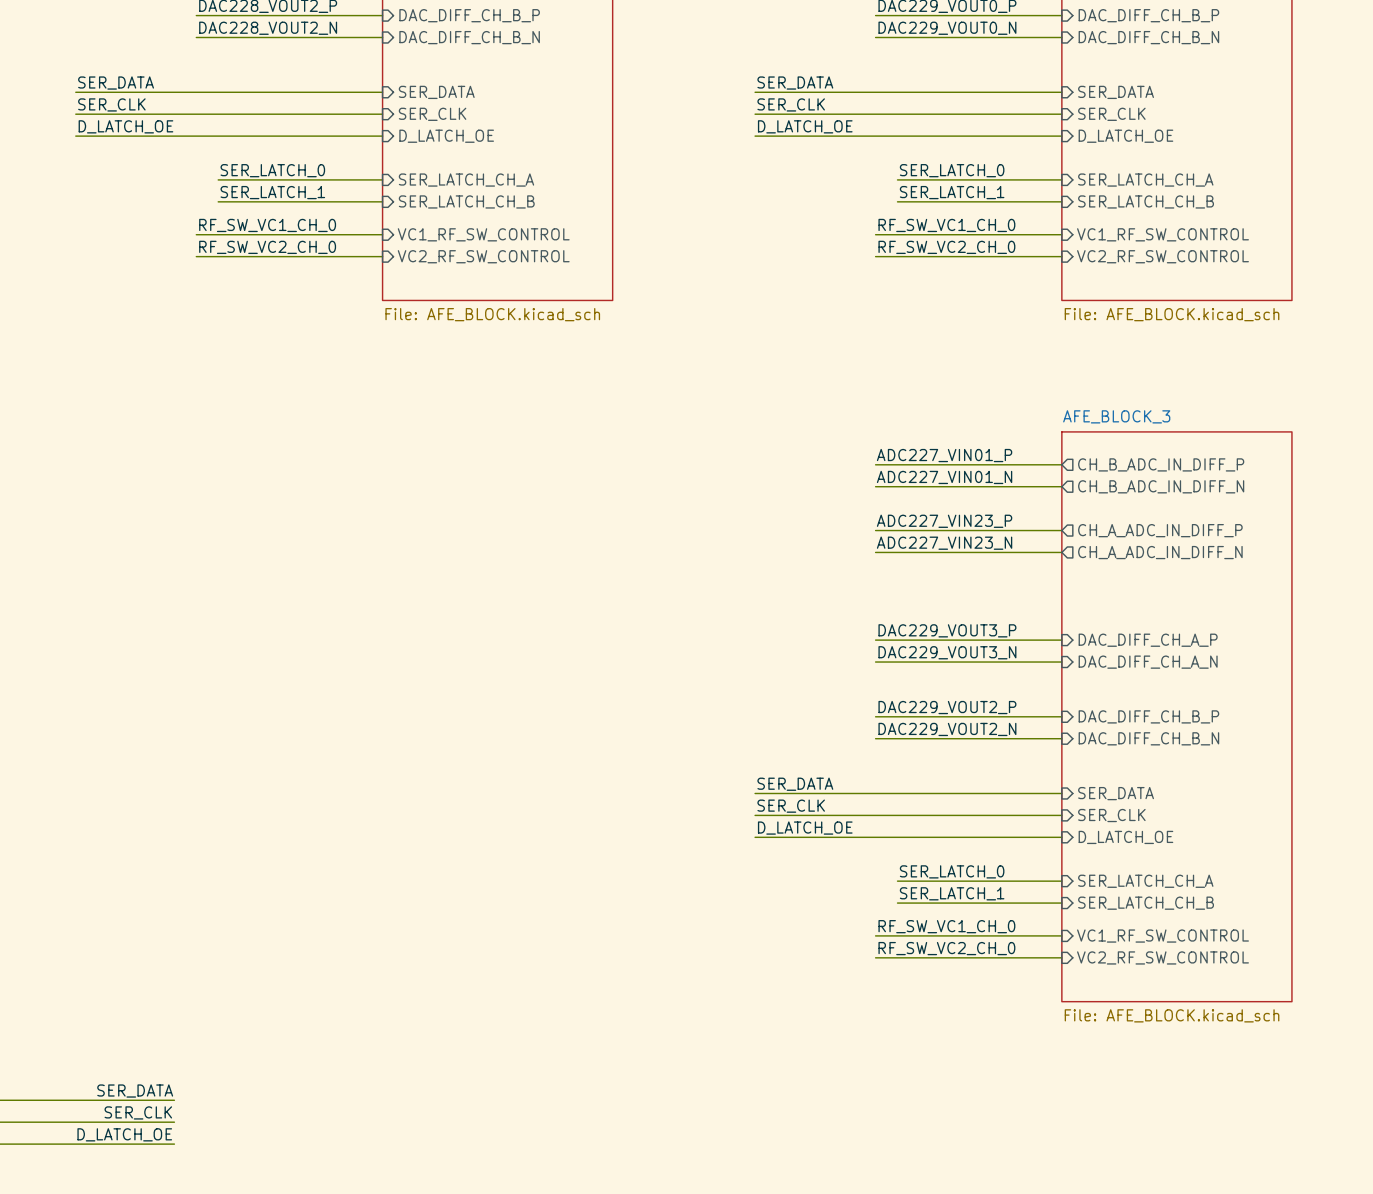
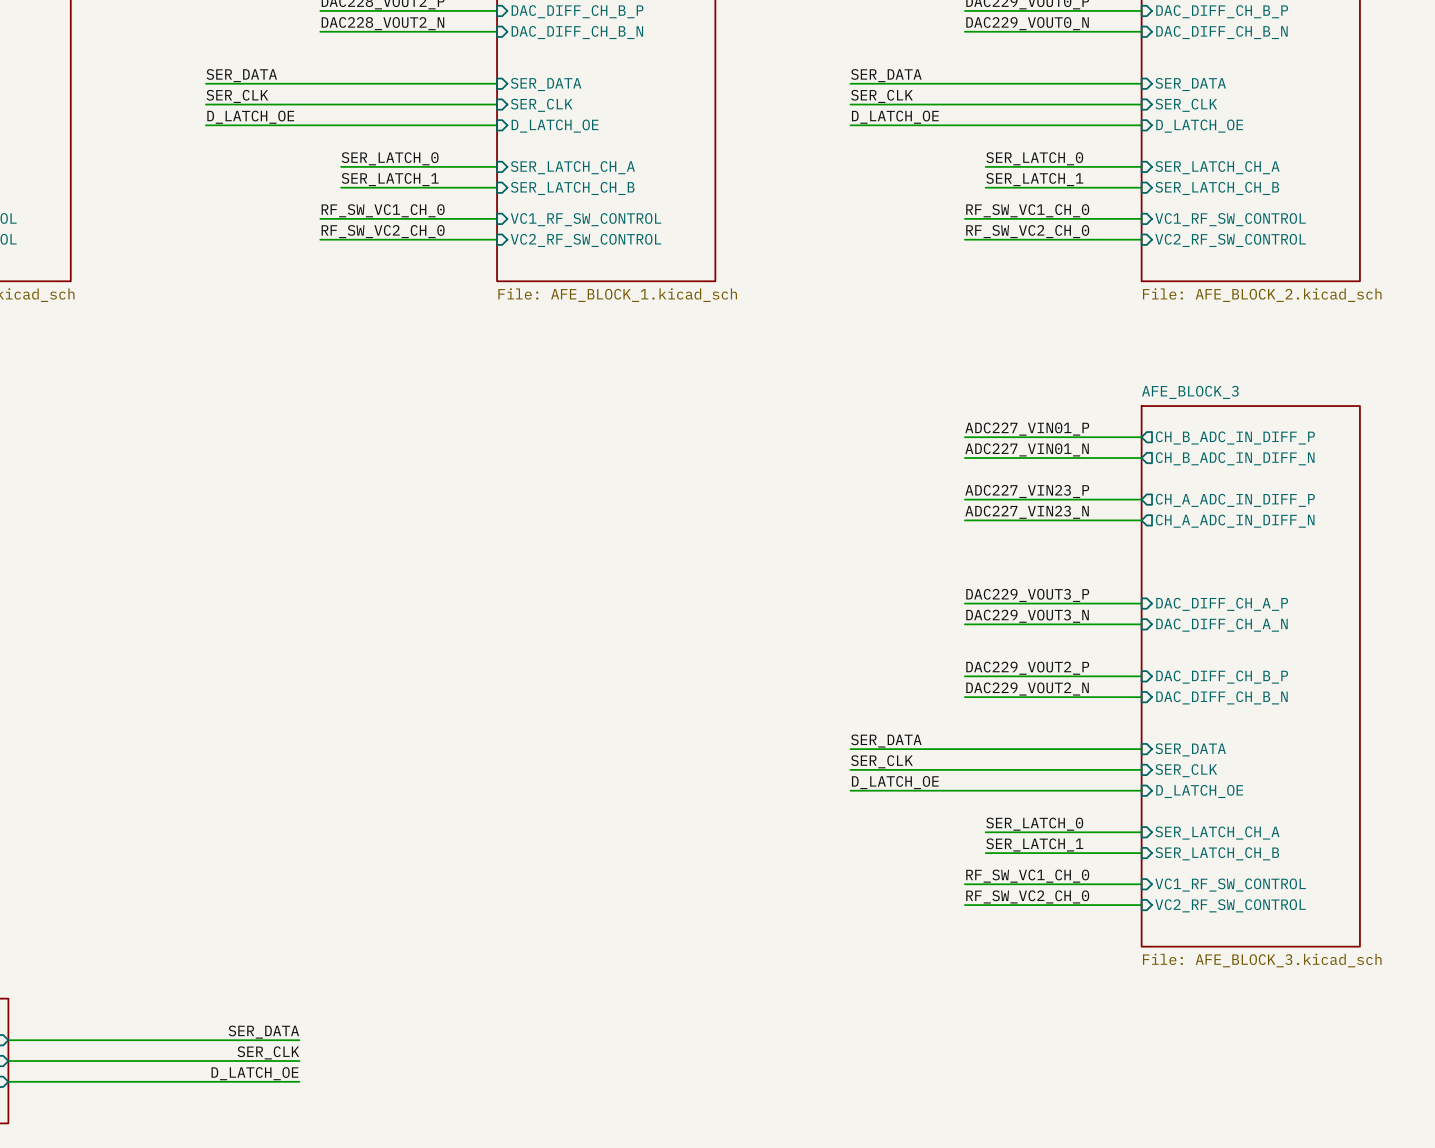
sheet value: File: AFE_BLOCK.kicad_sch (492, 314) -> File: AFE_BLOCK_1.kicad_sch (617, 295)
sheet value: File: AFE_BLOCK.kicad_sch (1172, 314) -> File: AFE_BLOCK_2.kicad_sch (1262, 295)
sheet AFE_BLOCK_3 value: File: AFE_BLOCK.kicad_sch (1172, 1015) -> File: AFE_BLOCK_3.kicad_sch (1262, 960)

